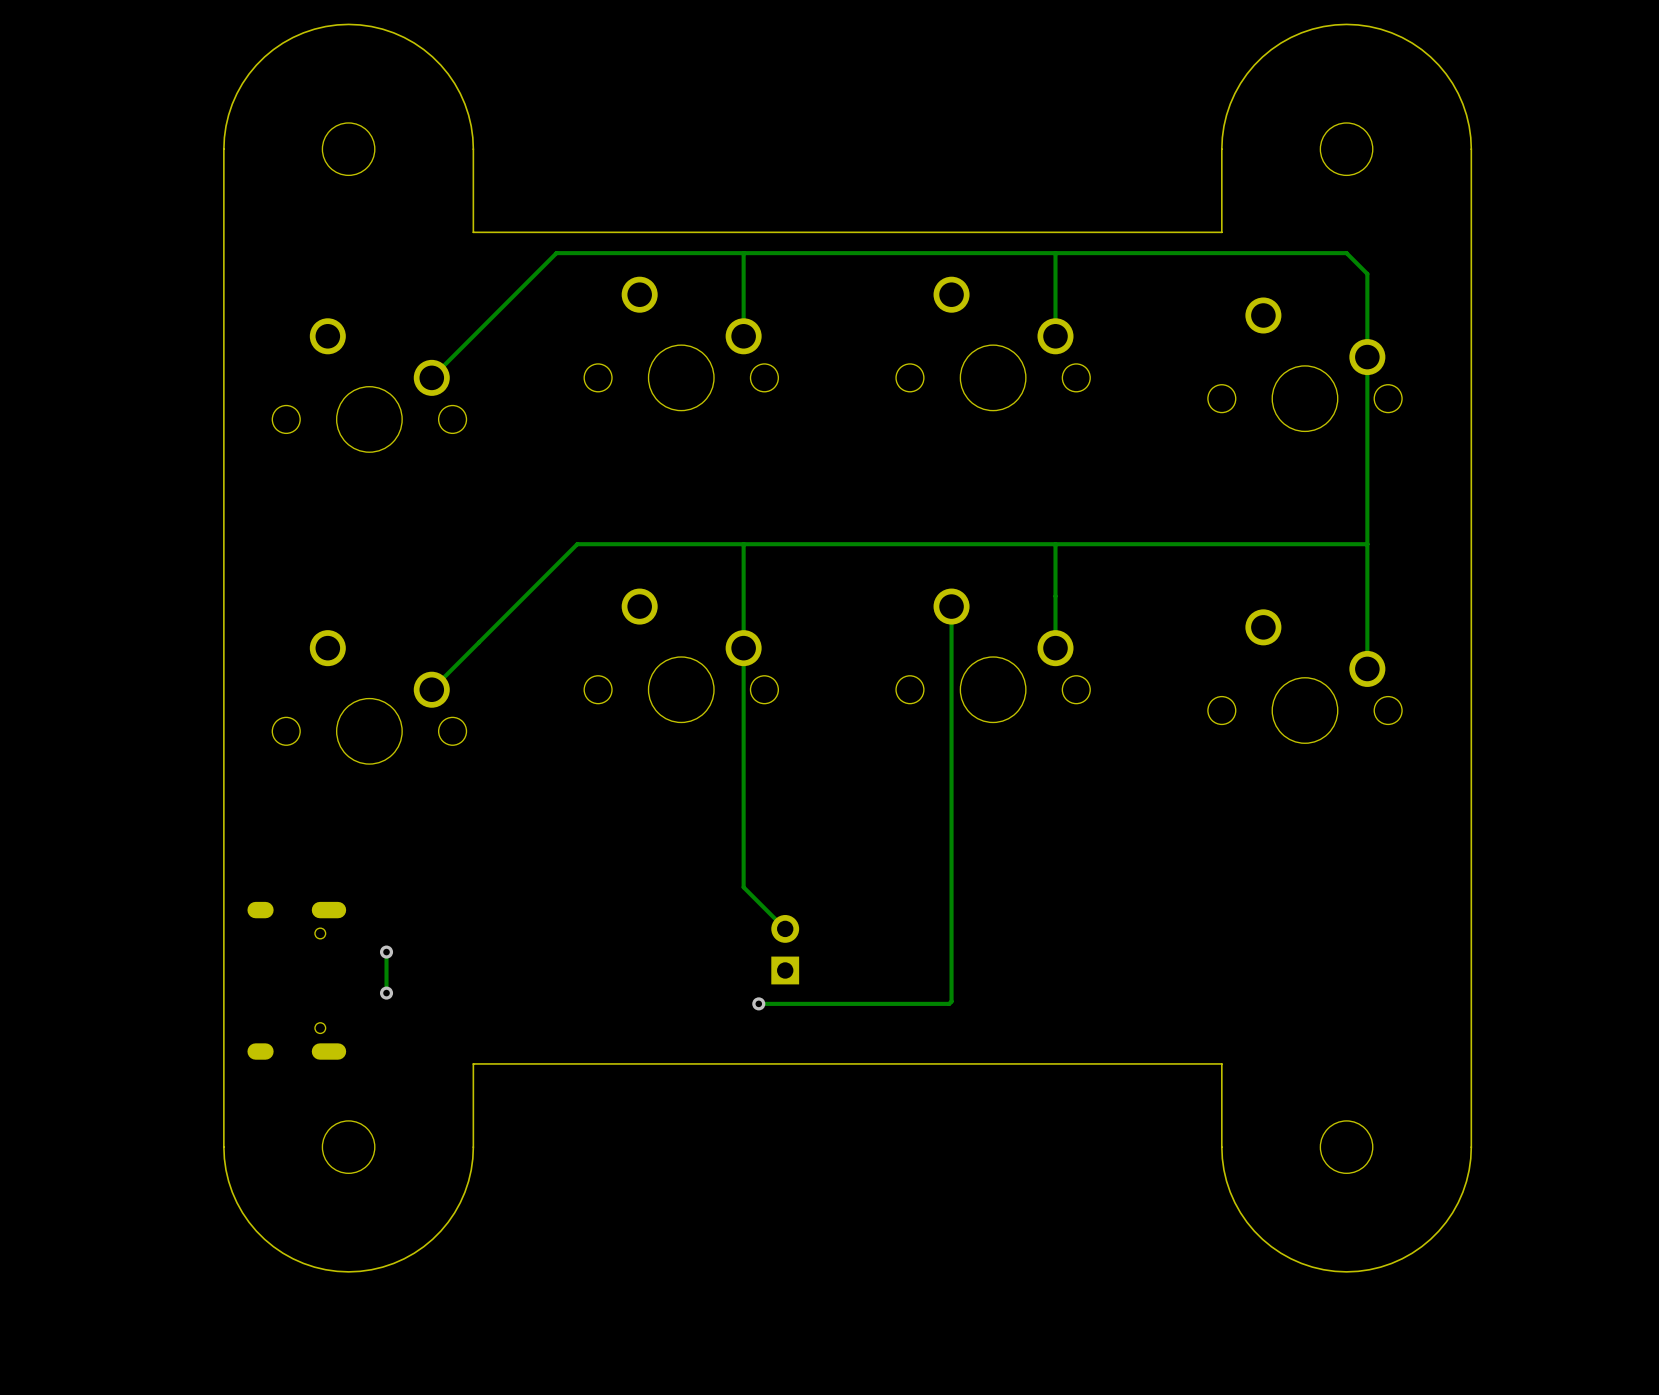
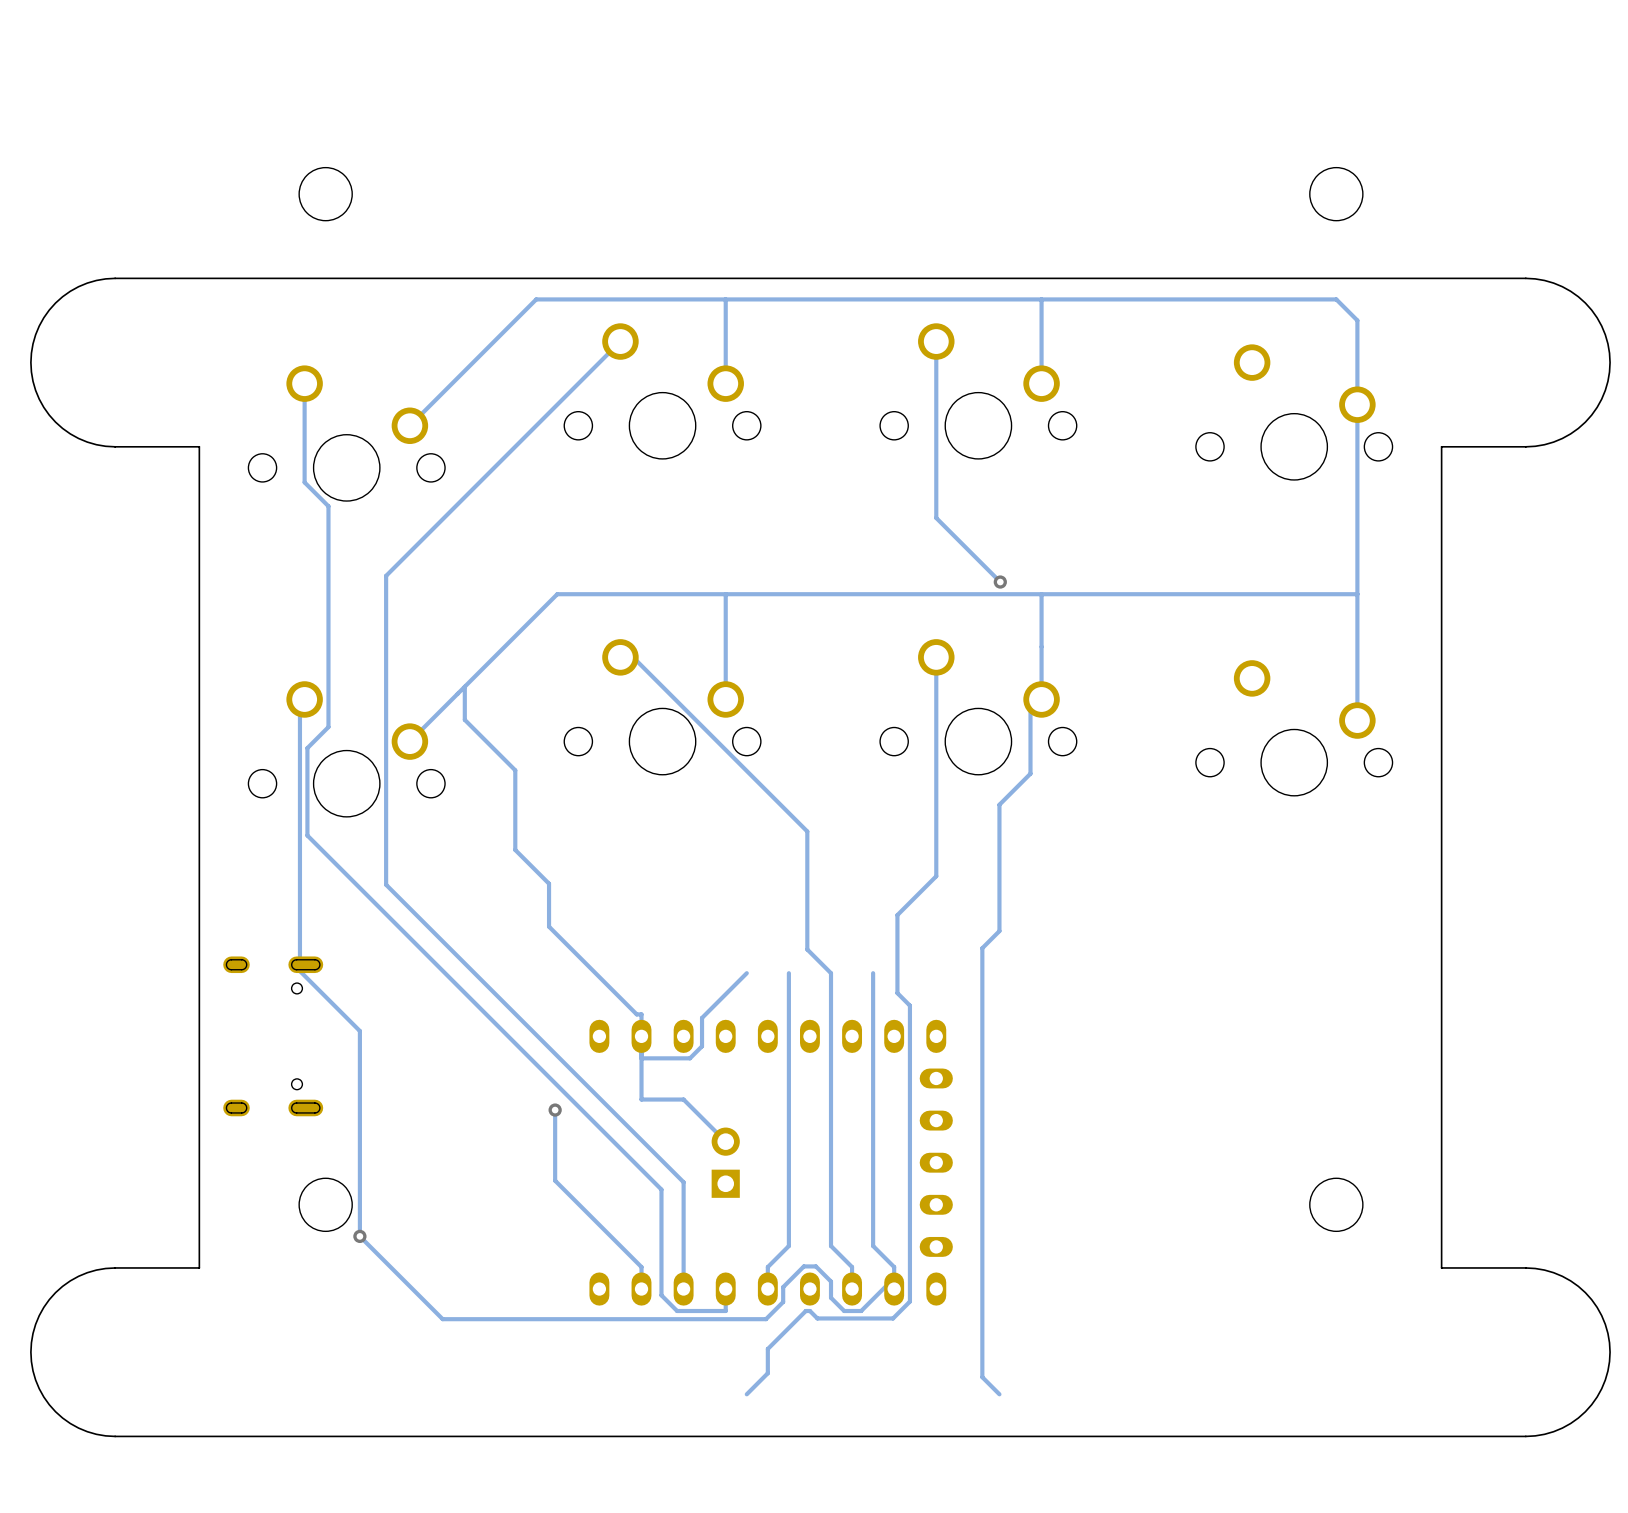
board edge: (473, 232) (473, 149) (471, 126) (464, 104) (454, 83) (432, 56) (404, 37) (382, 29) (360, 24) (325, 26) (303, 32) (282, 43) (264, 56) (242, 83) (232, 104) (225, 126) (223, 149) (223, 398) -> (452, 278) (105, 278) (78, 286) (55, 303) (43, 317) (35, 334) (30, 362) (35, 390) (43, 407) (55, 422) (78, 438) (96, 444) (115, 446) (199, 446)
board edge: (1221, 232) (1221, 149) (1226, 115) (1234, 93) (1247, 73) (1262, 56) (1280, 43) (1301, 32) (1335, 24) (1358, 24) (1380, 29) (1402, 37) (1421, 49) (1438, 65) (1452, 83) (1466, 115) (1471, 149) (1471, 1147) (1466, 1181) (1458, 1202) (1446, 1222) (1430, 1239) (1412, 1253) (1391, 1263) (1369, 1269) (1346, 1271) (1323, 1269) (1301, 1263) (1280, 1253) (1262, 1239) (1240, 1212) (1230, 1192) (1223, 1170) (1221, 1147) (1221, 1063) (473, 1063) (472, 1158) (468, 1181) (460, 1202) (440, 1231) (414, 1253) (382, 1267) (360, 1271) (337, 1271) (314, 1267) (282, 1253) (264, 1239) (242, 1212) (232, 1192) (225, 1170) (223, 1147) -> (1210, 278) (1535, 278) (1553, 283) (1578, 296) (1591, 310) (1605, 334) (1610, 362) (1605, 390) (1591, 415) (1570, 433) (1553, 442) (1535, 446) (1441, 446) (1441, 1267) (1525, 1267) (1544, 1270) (1570, 1280) (1585, 1292) (1601, 1315) (1607, 1333) (1610, 1352) (1605, 1380) (1597, 1397) (1585, 1411) (1562, 1428) (1544, 1434) (1525, 1436) (115, 1436) (87, 1431) (70, 1423) (55, 1411) (43, 1397) (33, 1370) (30, 1352) (33, 1333) (43, 1307) (62, 1286) (78, 1276) (96, 1270) (115, 1267) (199, 1267) (199, 1204)
track: none -> (620, 341) (386, 575) (386, 884) (683, 1182) (683, 1289)
track: none -> (936, 341) (936, 518) (1000, 582)
track: none -> (304, 383) (304, 482) (328, 506) (328, 727) (307, 748) (307, 835) (661, 1189) (661, 1295) (677, 1311) (725, 1311) (725, 1289)
via: none -> (1000, 582)
track: none -> (620, 657) (633, 657) (807, 831) (807, 949) (831, 973) (831, 1246) (852, 1267) (852, 1289)
track: none -> (464, 686) (464, 719) (515, 770) (515, 849) (549, 883) (549, 926) (636, 1014) (641, 1014) (641, 1099) (683, 1099) (725, 1141)
track: none -> (304, 699) (299, 704) (299, 971) (359, 1031) (359, 1236) (442, 1319) (766, 1319) (783, 1302) (783, 1287) (803, 1266) (815, 1266) (831, 1281) (831, 1297) (844, 1311) (861, 1311) (894, 1278)
track: (743, 648) (743, 887) (785, 928) -> none
track: none -> (1041, 699) (1030, 710) (1030, 773) (999, 804) (999, 931) (982, 948) (982, 1377) (999, 1394)
track: (951, 822) (951, 1001) (949, 1003) (758, 1003) -> (936, 876) (897, 915) (897, 993) (909, 1005) (909, 1301) (893, 1318) (817, 1318) (809, 1311) (805, 1311) (767, 1348) (767, 1373) (746, 1394)
track: none -> (746, 973) (702, 1017) (702, 1046) (689, 1058) (641, 1058)
track: none -> (788, 973) (788, 1246) (767, 1267) (767, 1289)
track: none -> (873, 973) (873, 1246) (894, 1267) (894, 1289)
part position: (785, 949) -> (725, 1162)
track: (386, 952) (386, 993) -> none
via: (386, 952) -> none
via: (386, 993) -> none
via: (758, 1003) -> none
track: none -> (555, 1110) (555, 1180) (641, 1267) (641, 1289)
via: none -> (555, 1110)
part: none -> (771, 1162)
via: none -> (359, 1236)

